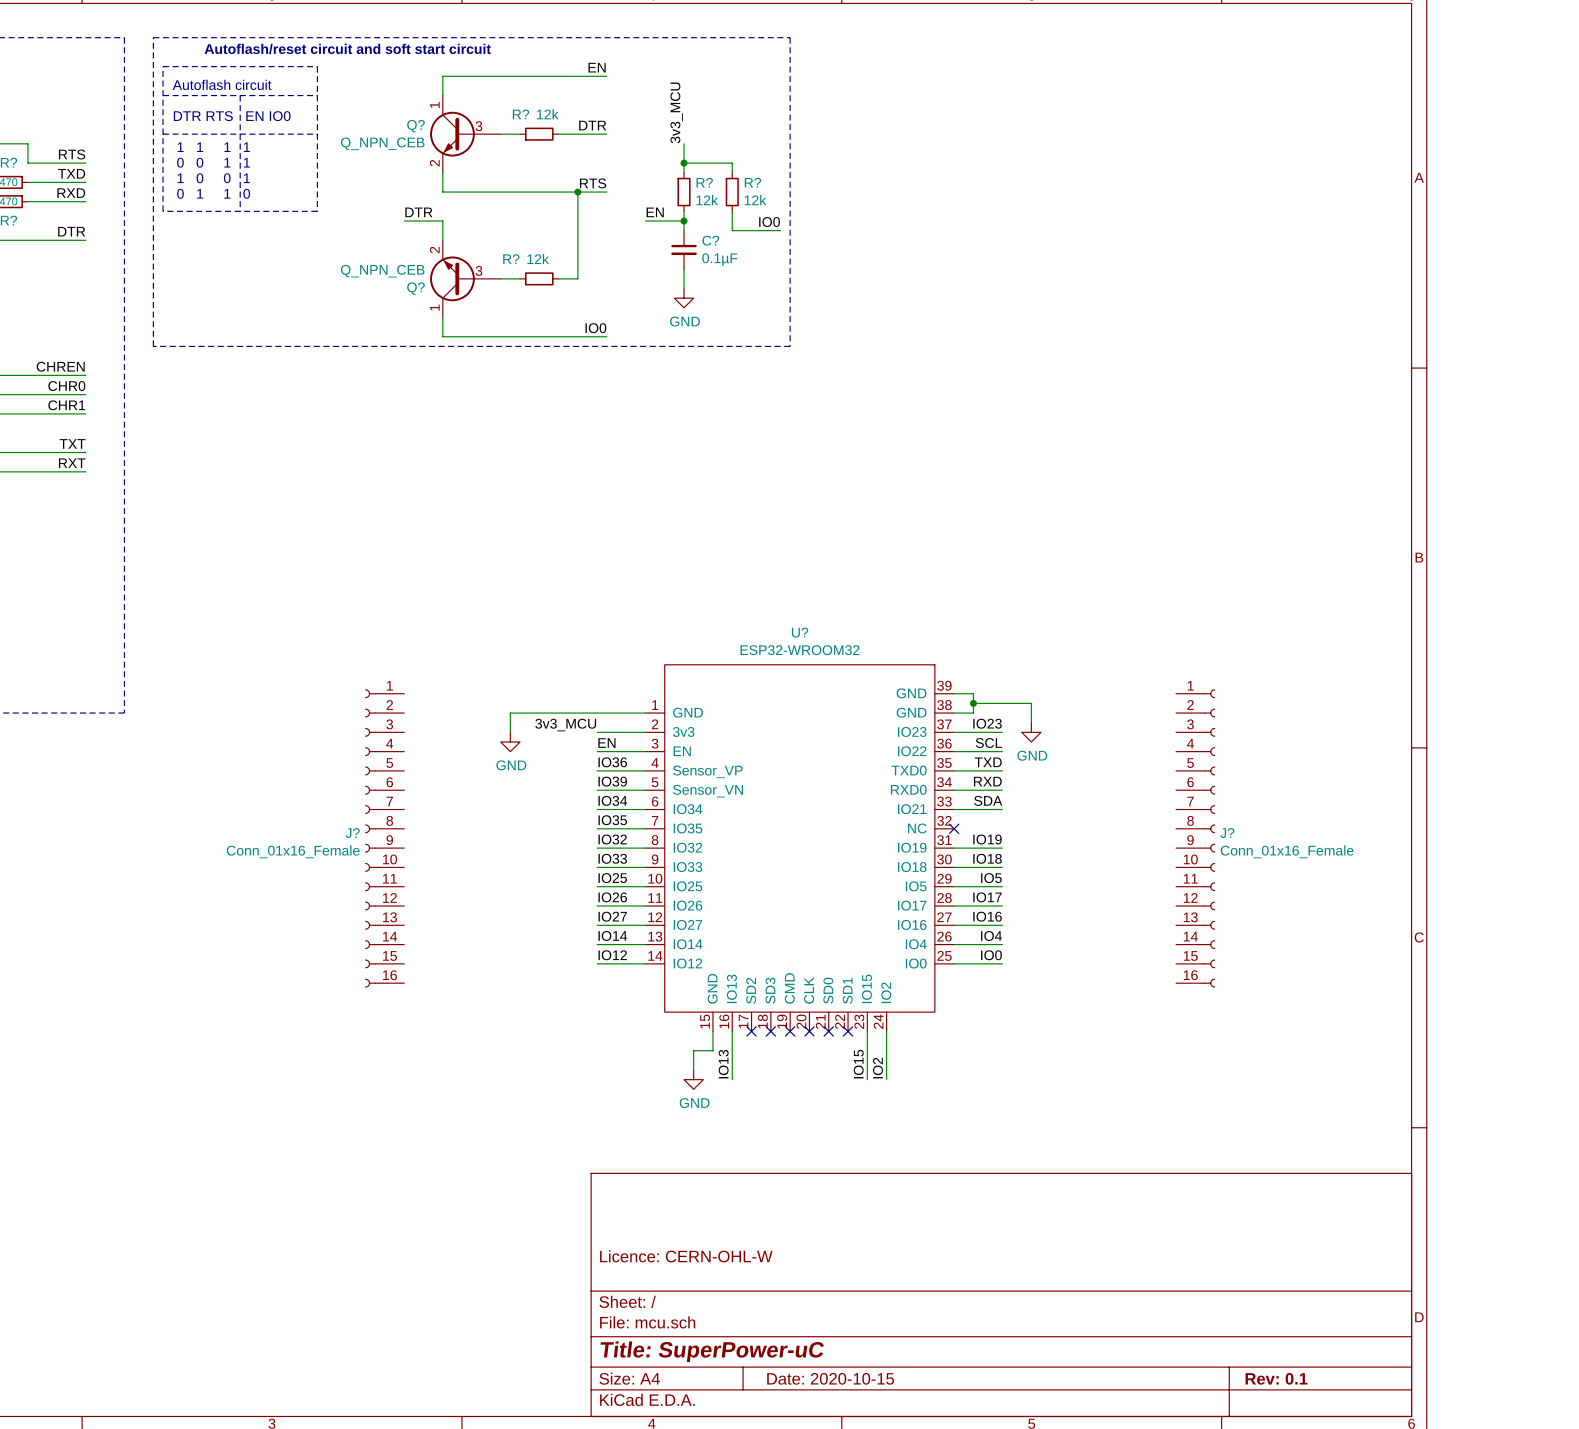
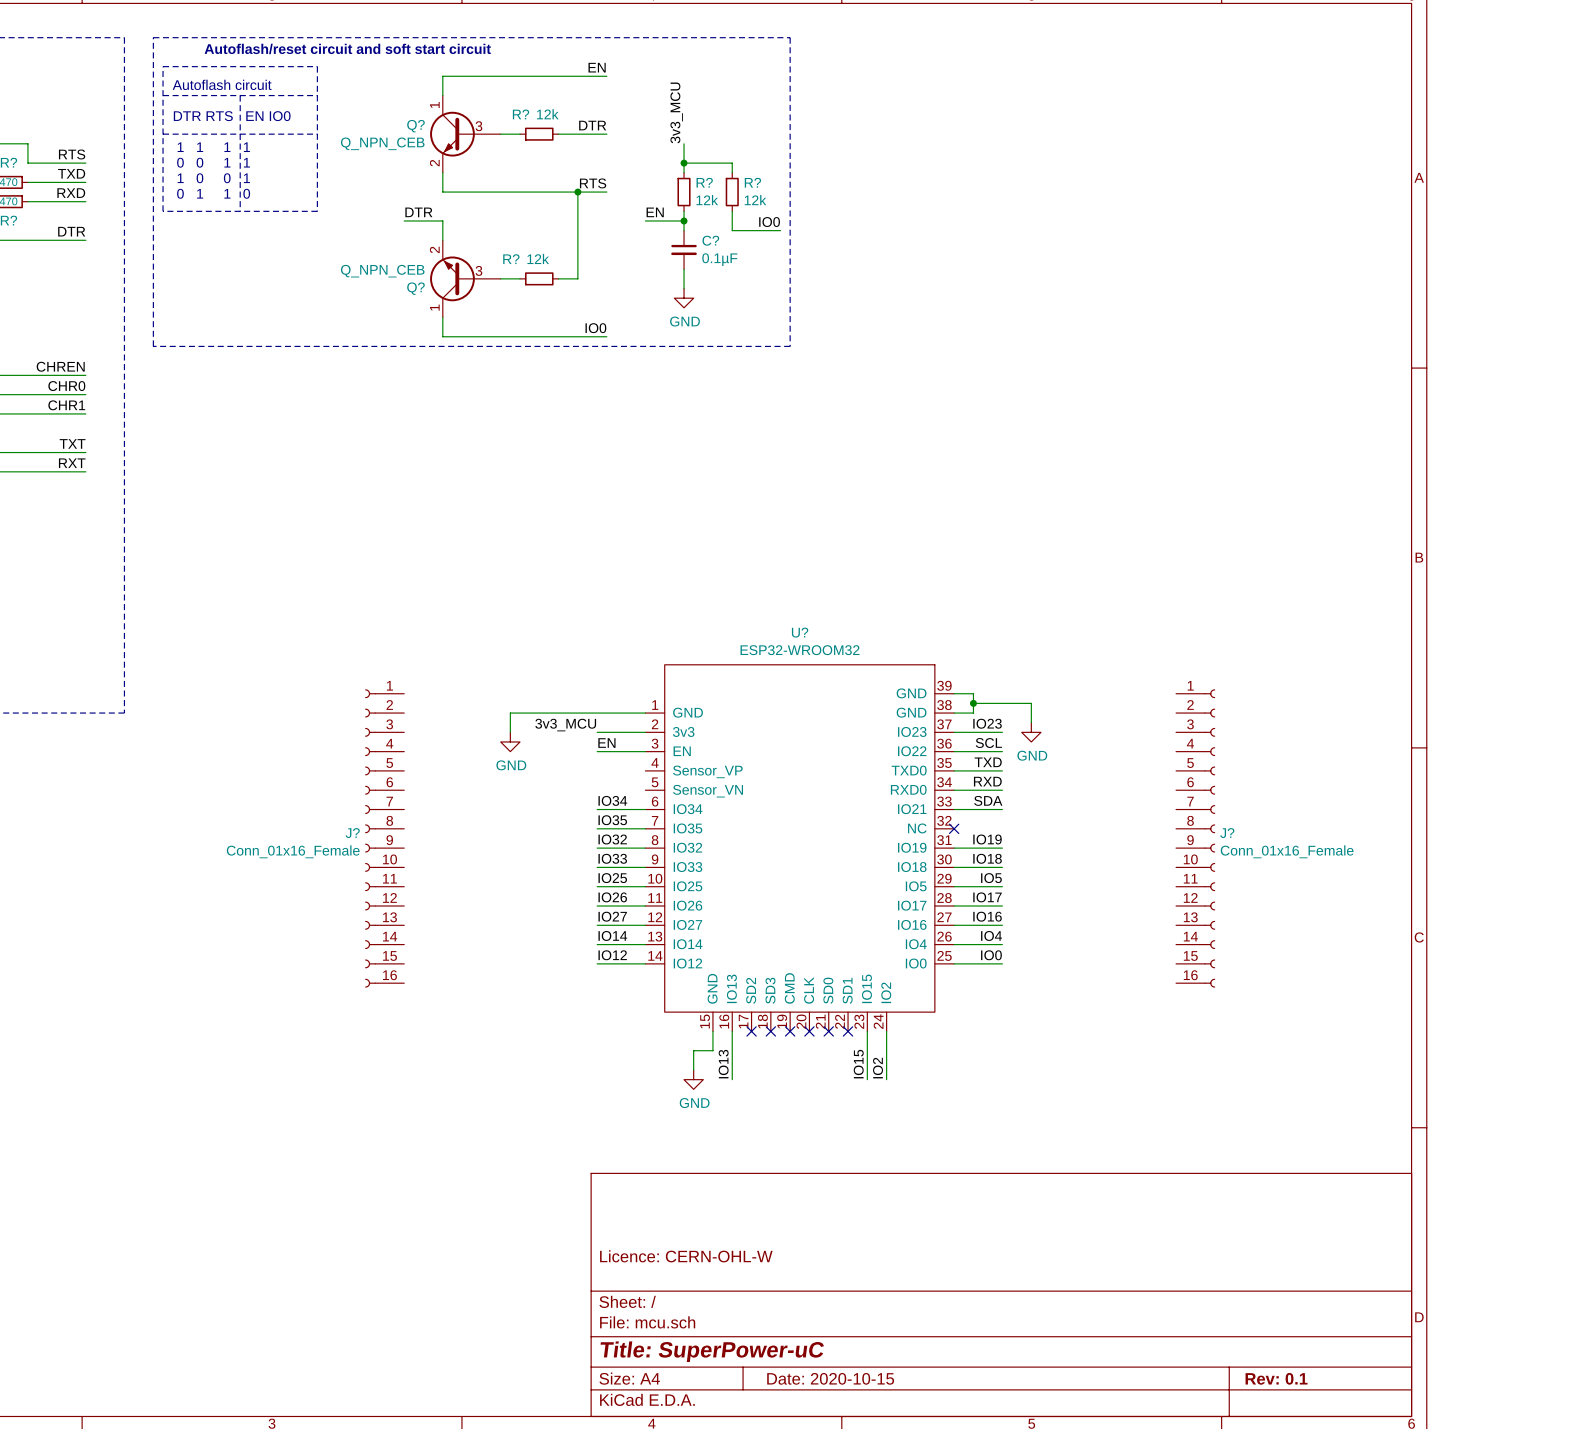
label: IO36 (612, 762) -> none
wire: (597, 770) (645, 770) -> none
label: IO39 (612, 781) -> none
wire: (597, 790) (645, 790) -> none

